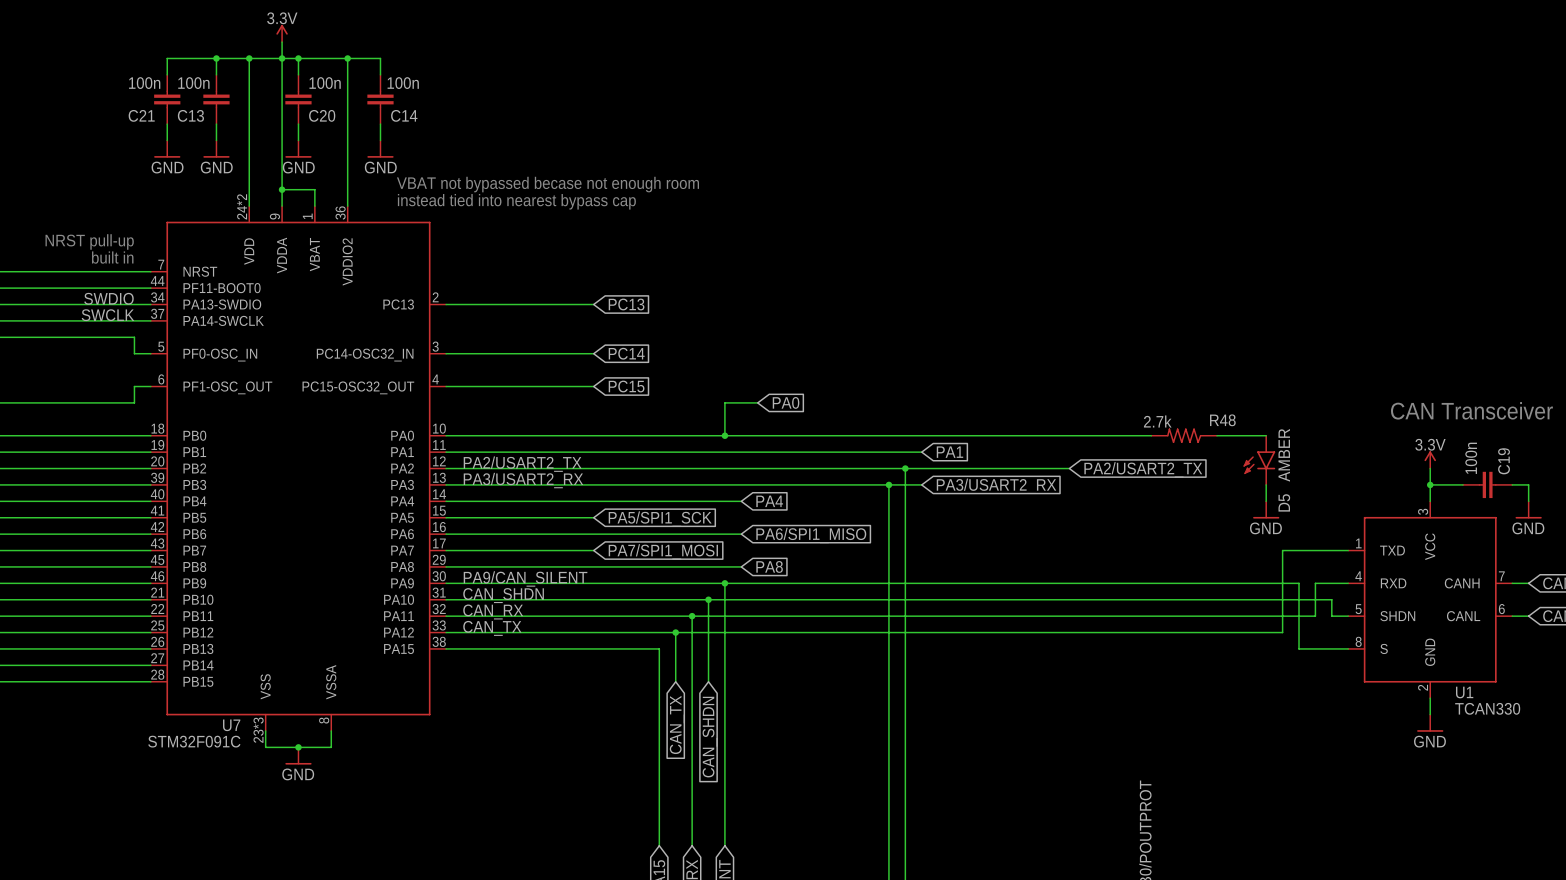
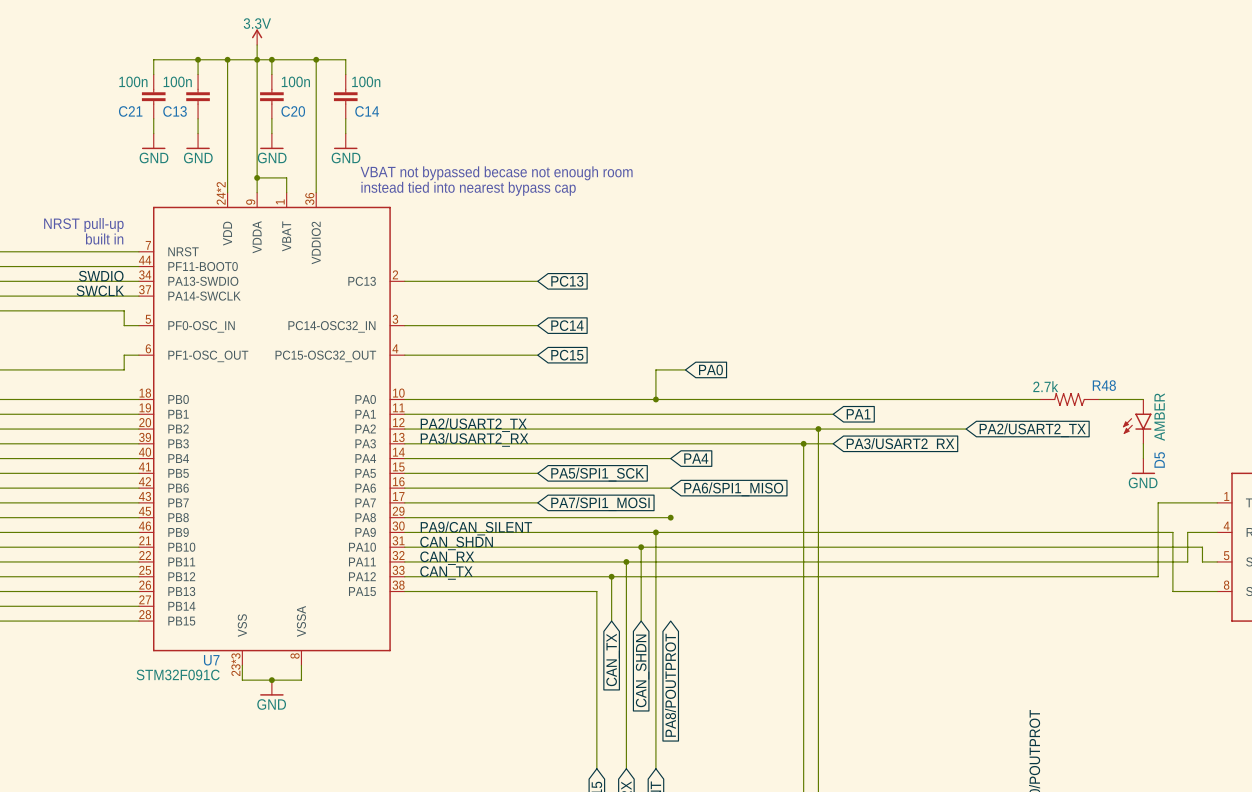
junction: none -> (670, 517)
global label: PA8 (769, 566) -> none
global label: none -> PA8/POUTPROT (670, 685)

